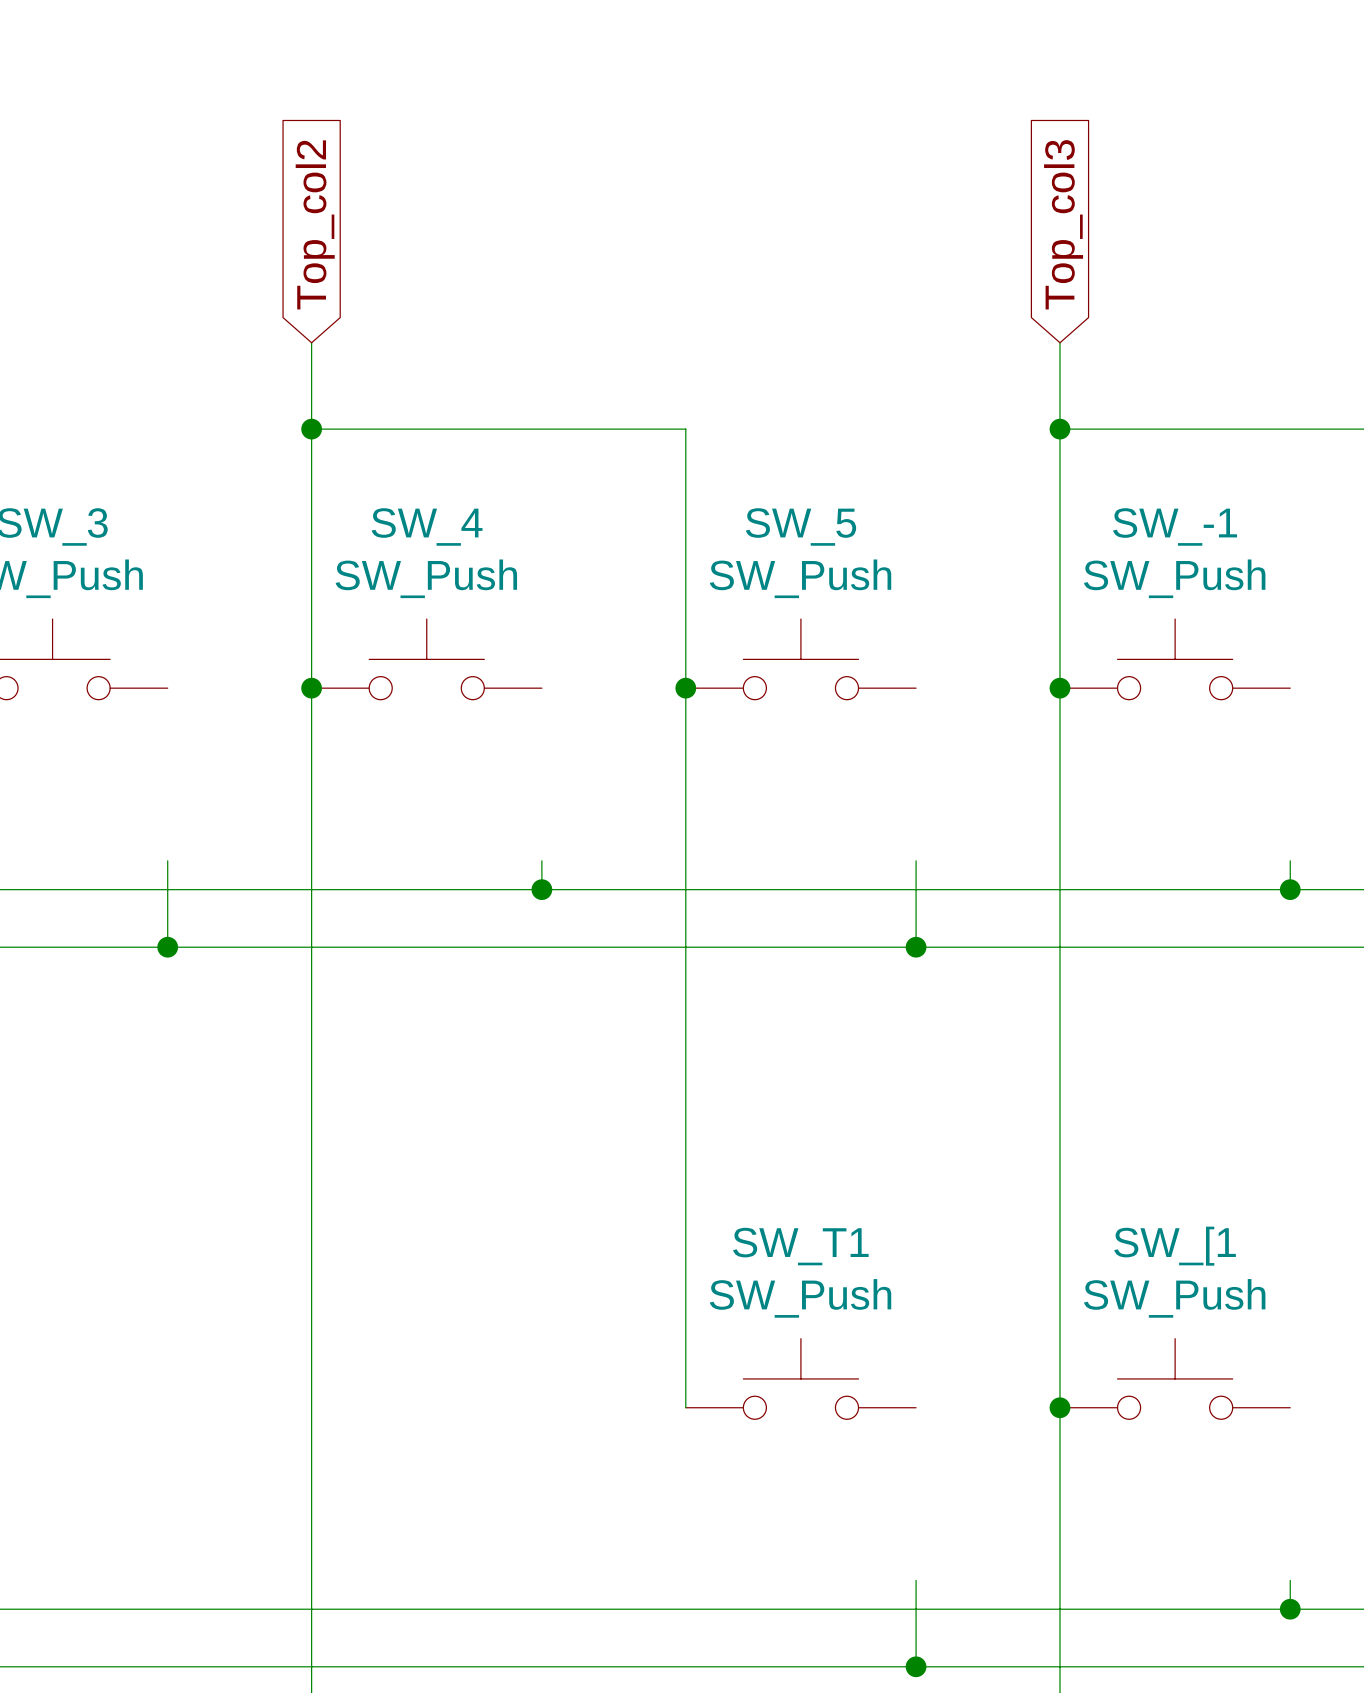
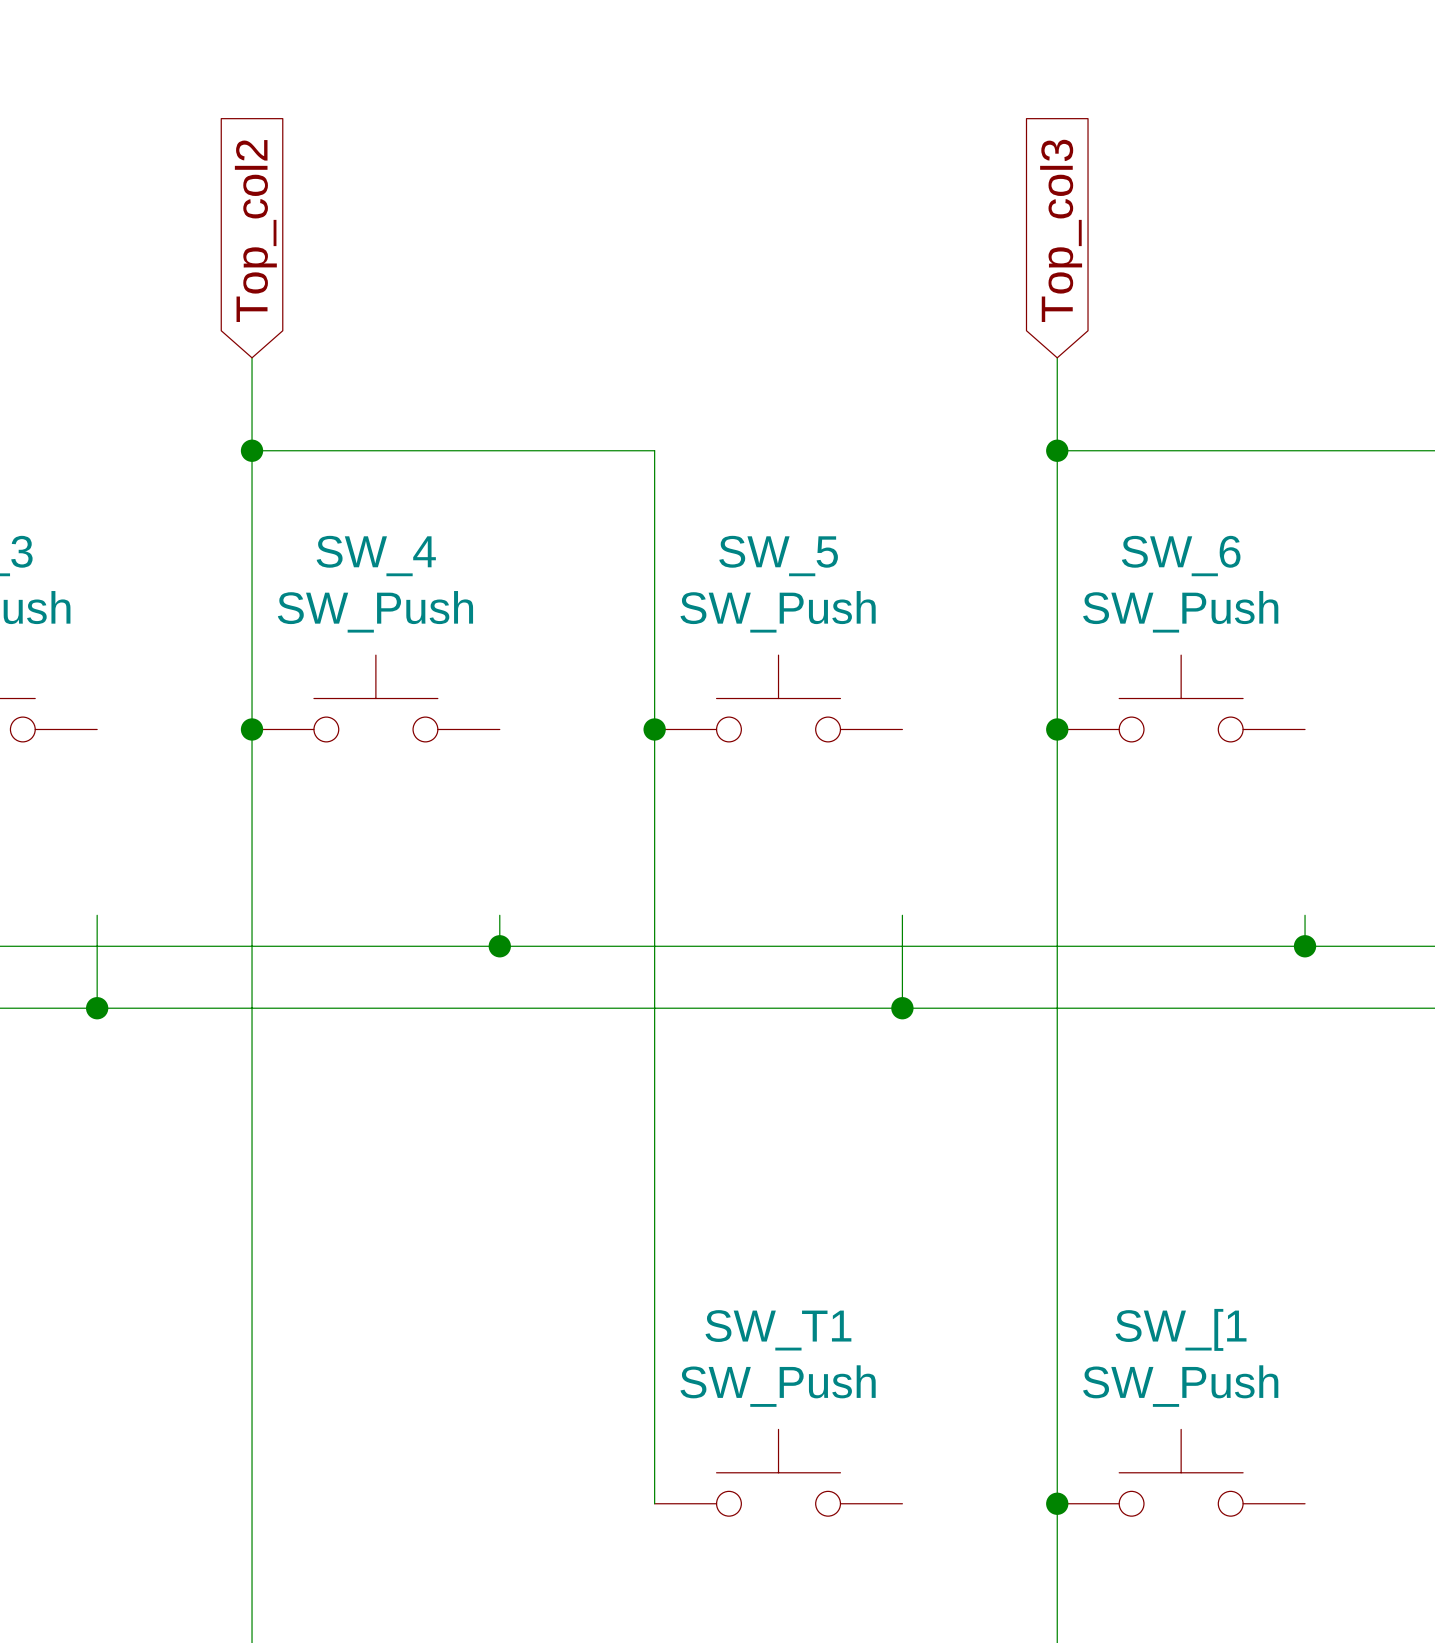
SW_-1 name: SW_-1 (1175, 526) -> SW_6 (1181, 556)

